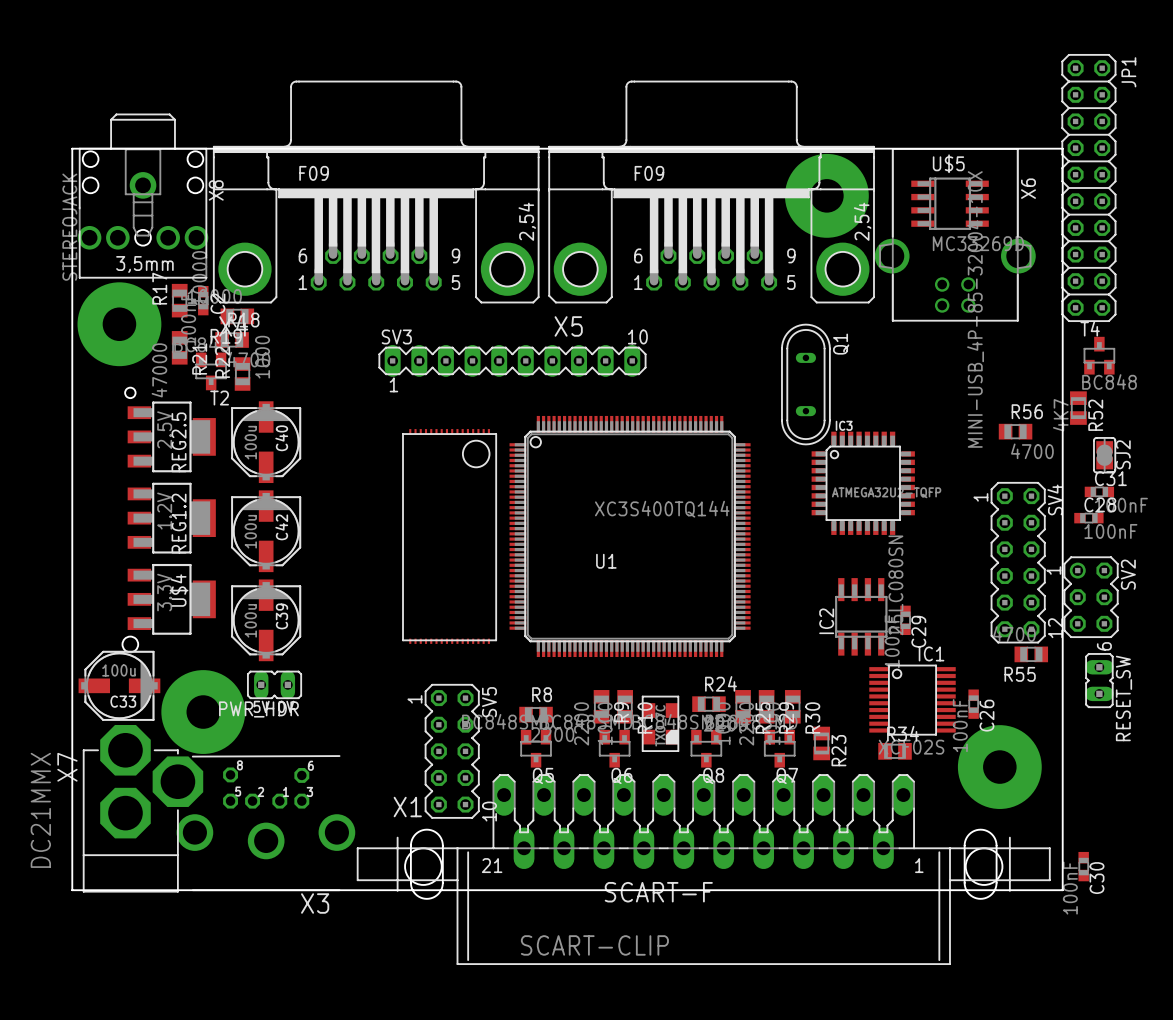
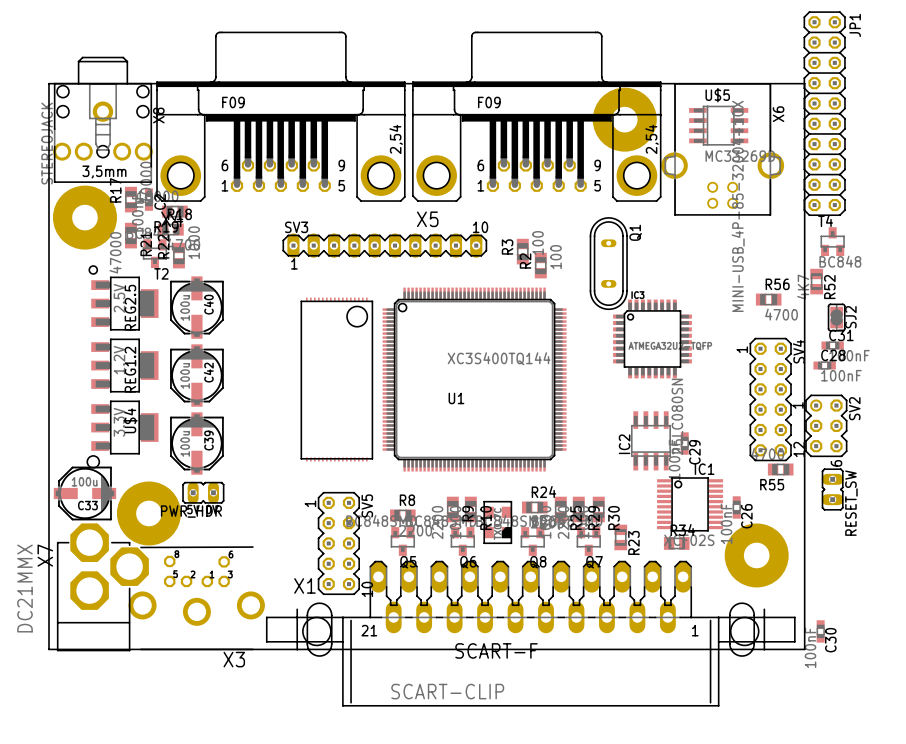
R3: none -> 100 (522, 251)
R2: none -> 100 (540, 265)

